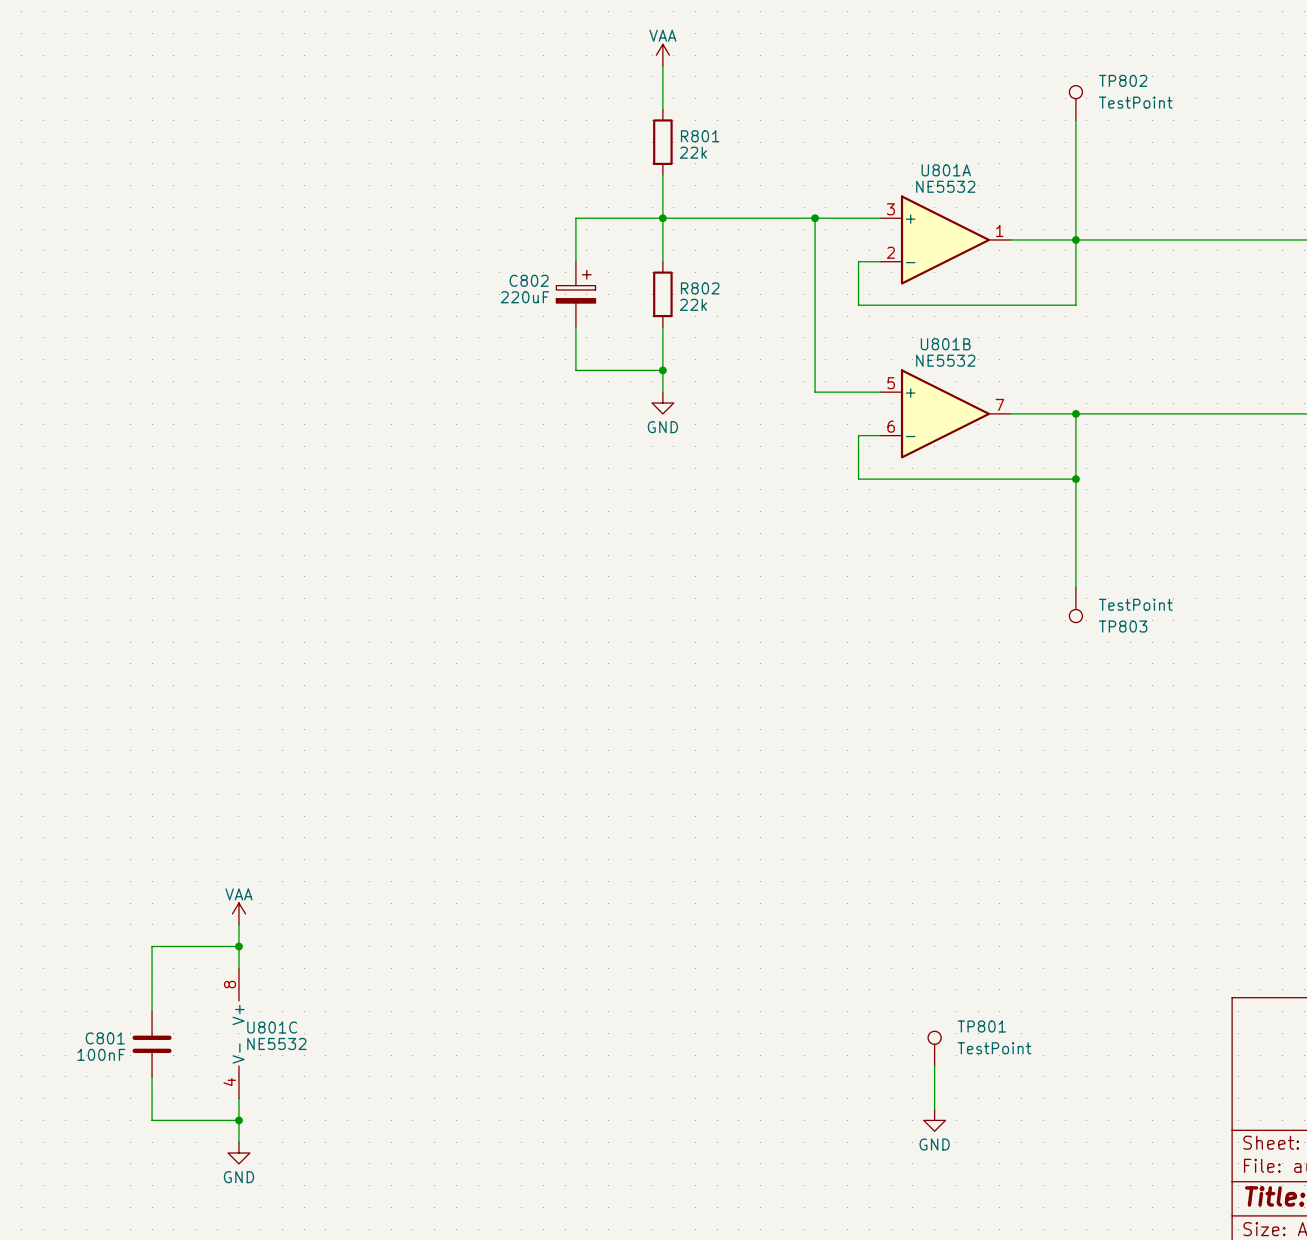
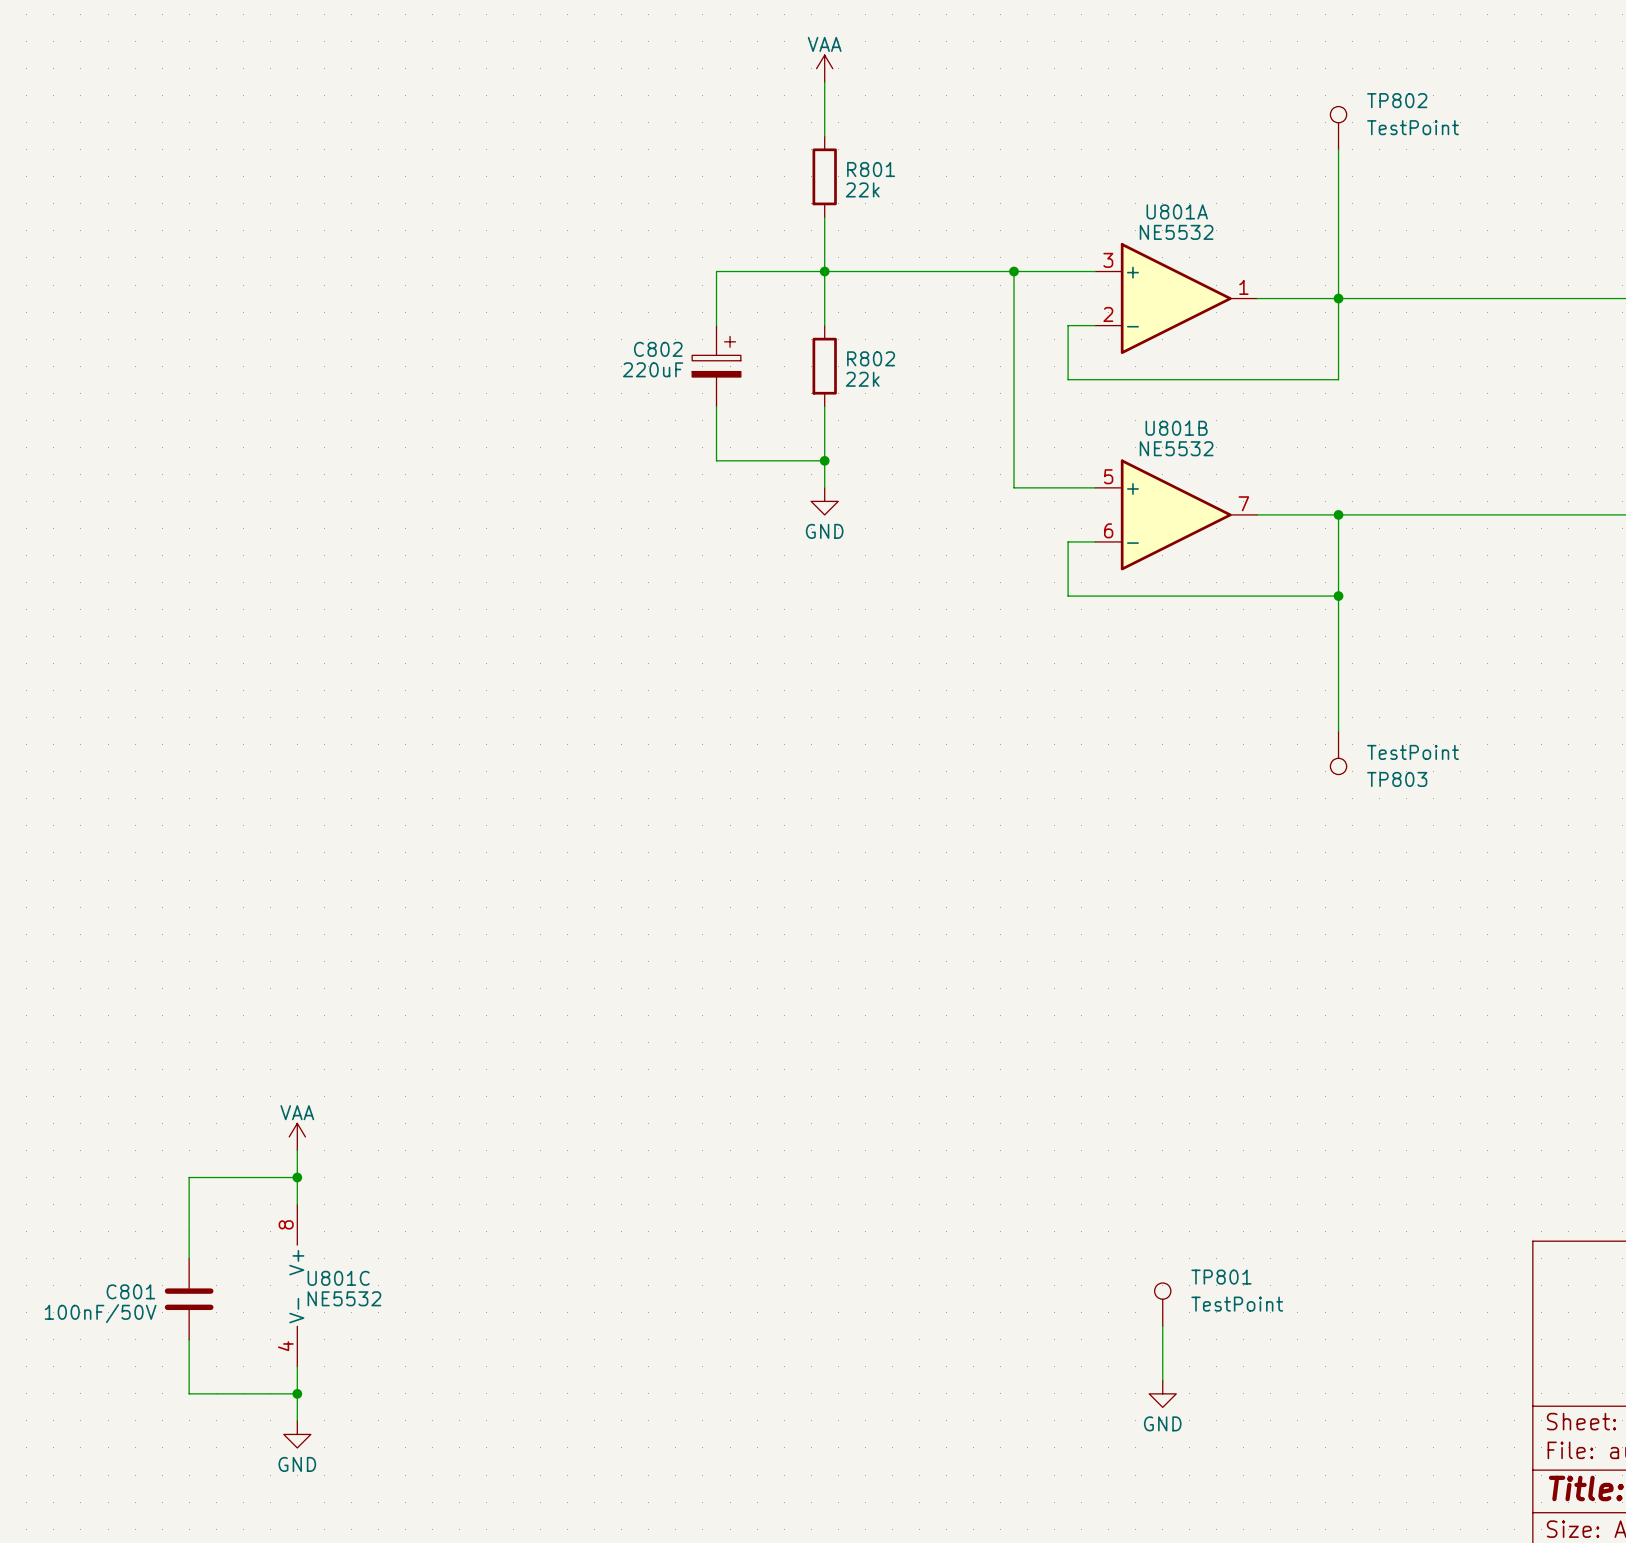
C801 value: 100nF (101, 1054) -> 100nF/50V (100, 1313)

